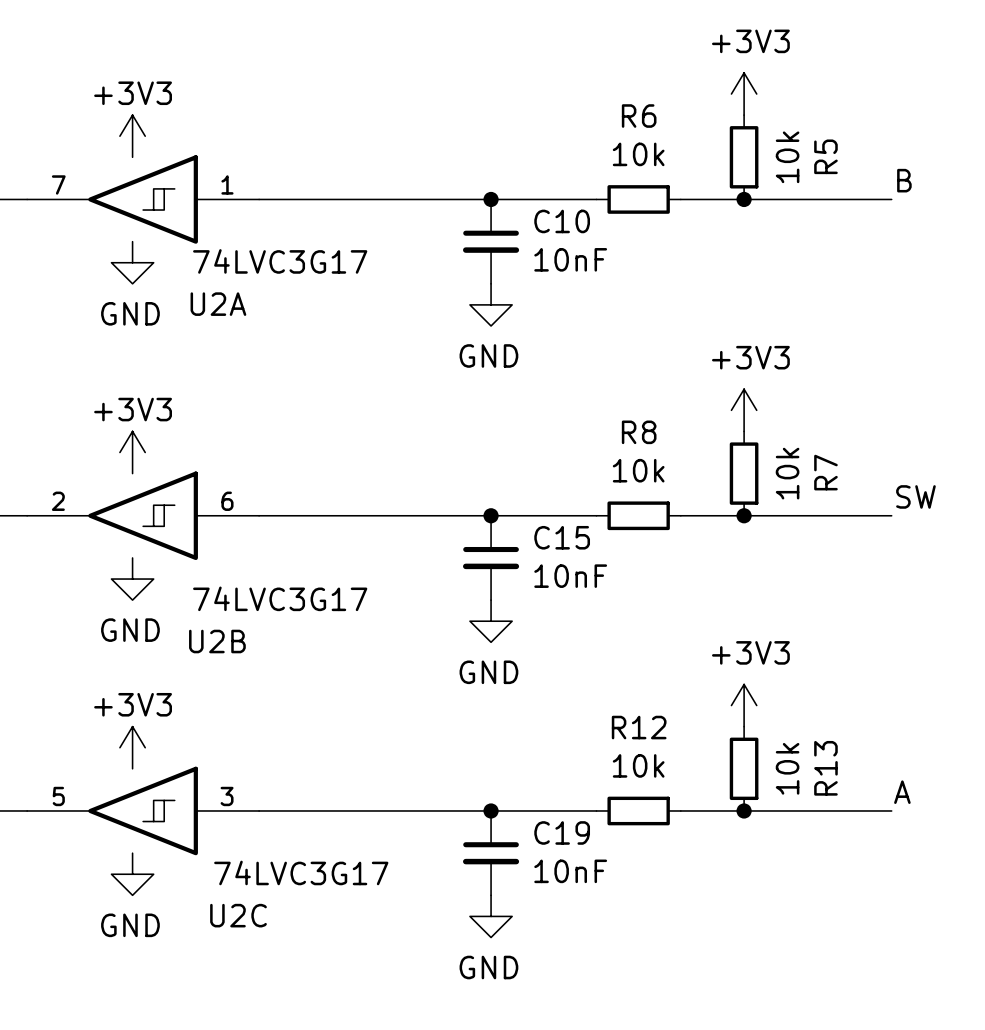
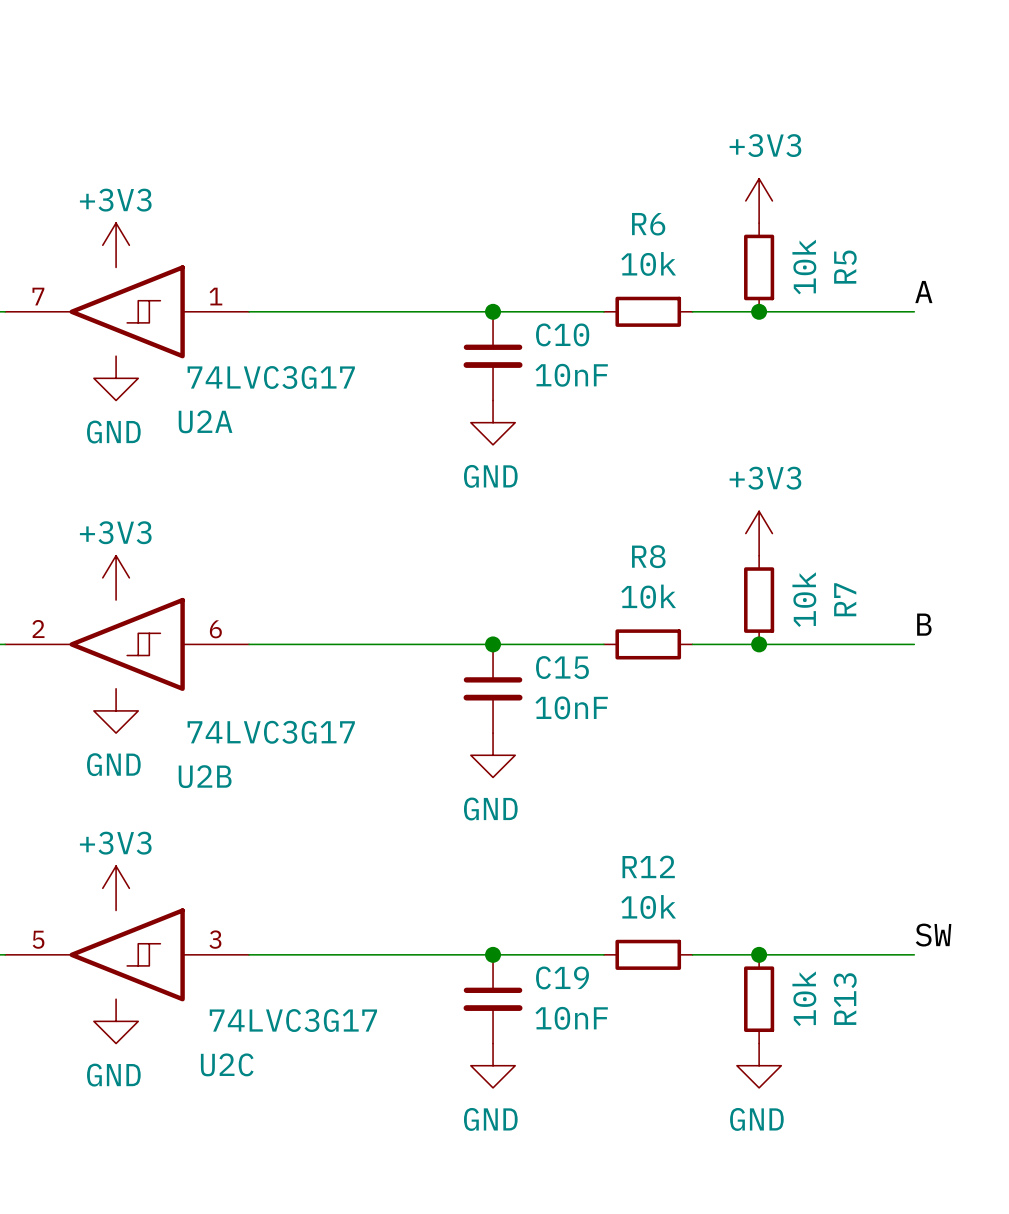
label: B (904, 180) -> A (923, 292)
label: SW (915, 496) -> B (924, 624)
power symbol: +3V3 (744, 705) -> none
R13 position: (744, 768) -> (759, 999)
label: A (902, 792) -> SW (933, 935)
power symbol: none -> GND (759, 1065)

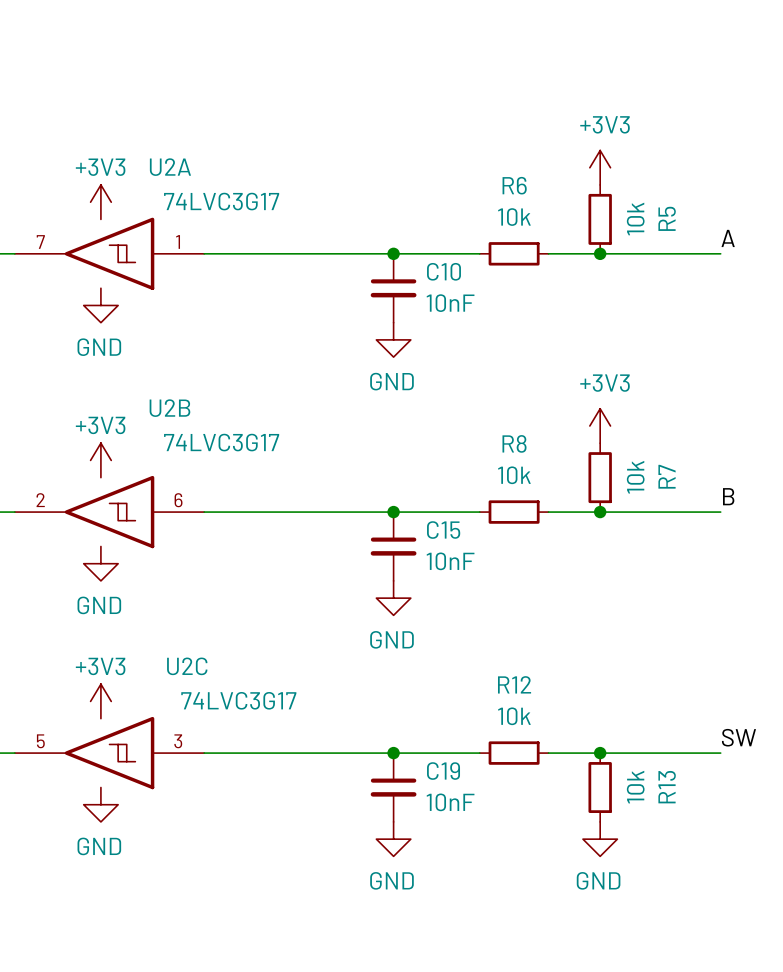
U2A flip: as is (127, 311) -> up-down (109, 253)
U2B flip: as is (127, 644) -> up-down (109, 512)
U2C flip: as is (127, 954) -> up-down (109, 753)

